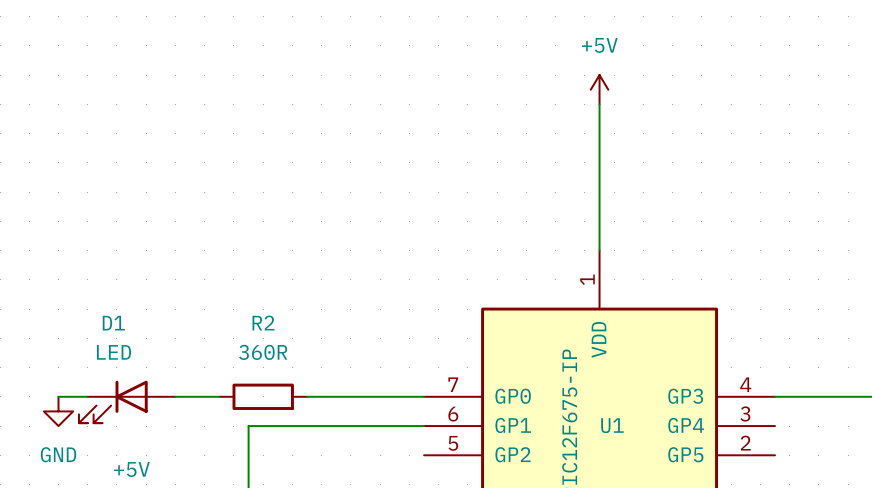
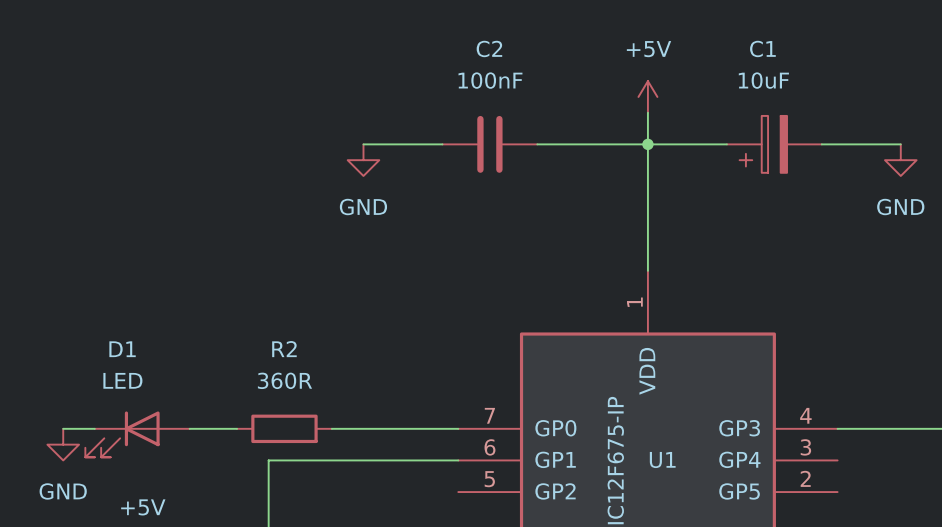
wire: none -> (363, 144) (442, 144)
C2: none -> 100nF (489, 144)
wire: none -> (537, 144) (726, 144)
junction: none -> (647, 144)
C1: none -> 10uF (774, 144)
wire: none -> (821, 144) (900, 144)
power symbol: none -> GND (363, 160)
power symbol: none -> GND (900, 160)

